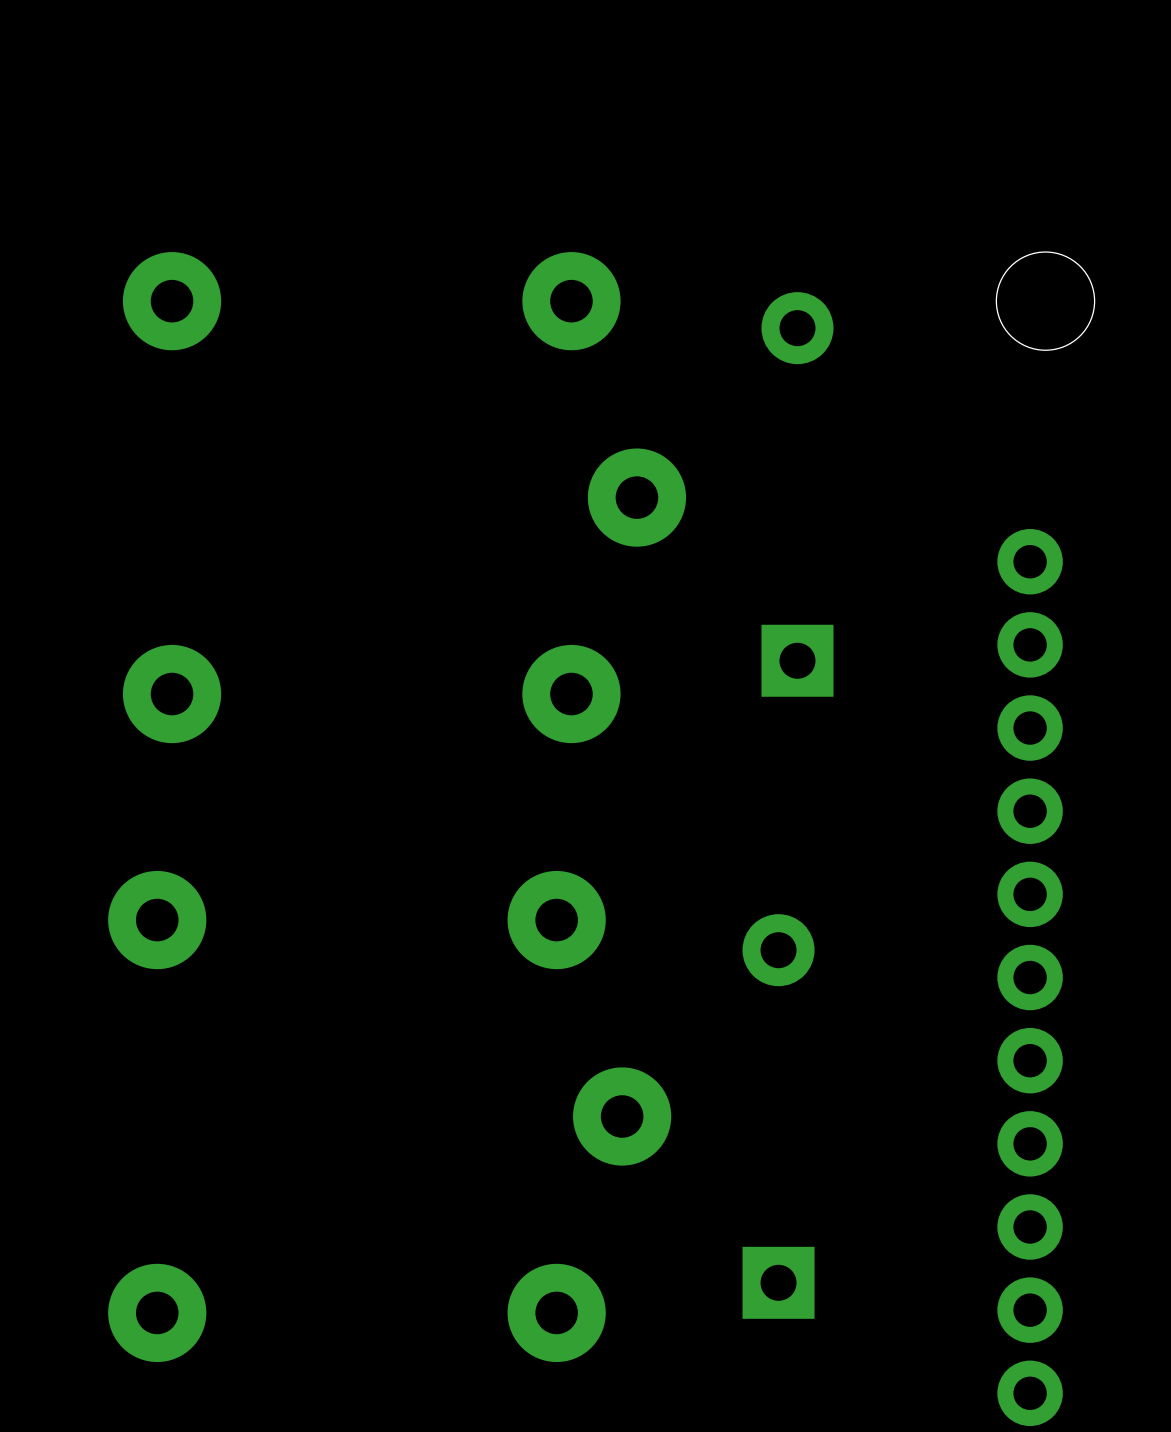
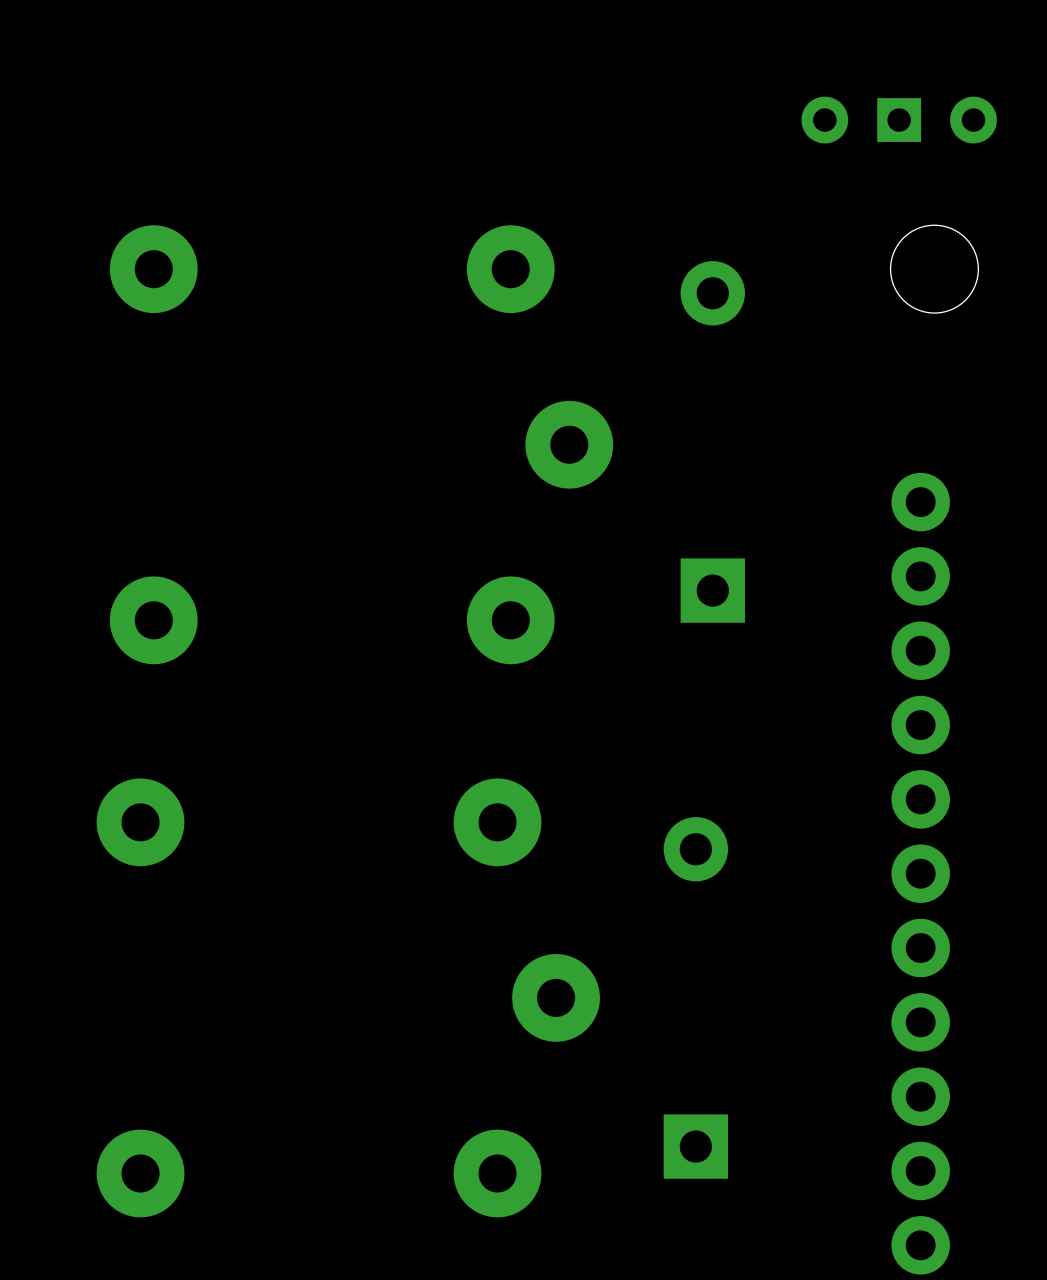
part: none -> (899, 120)

